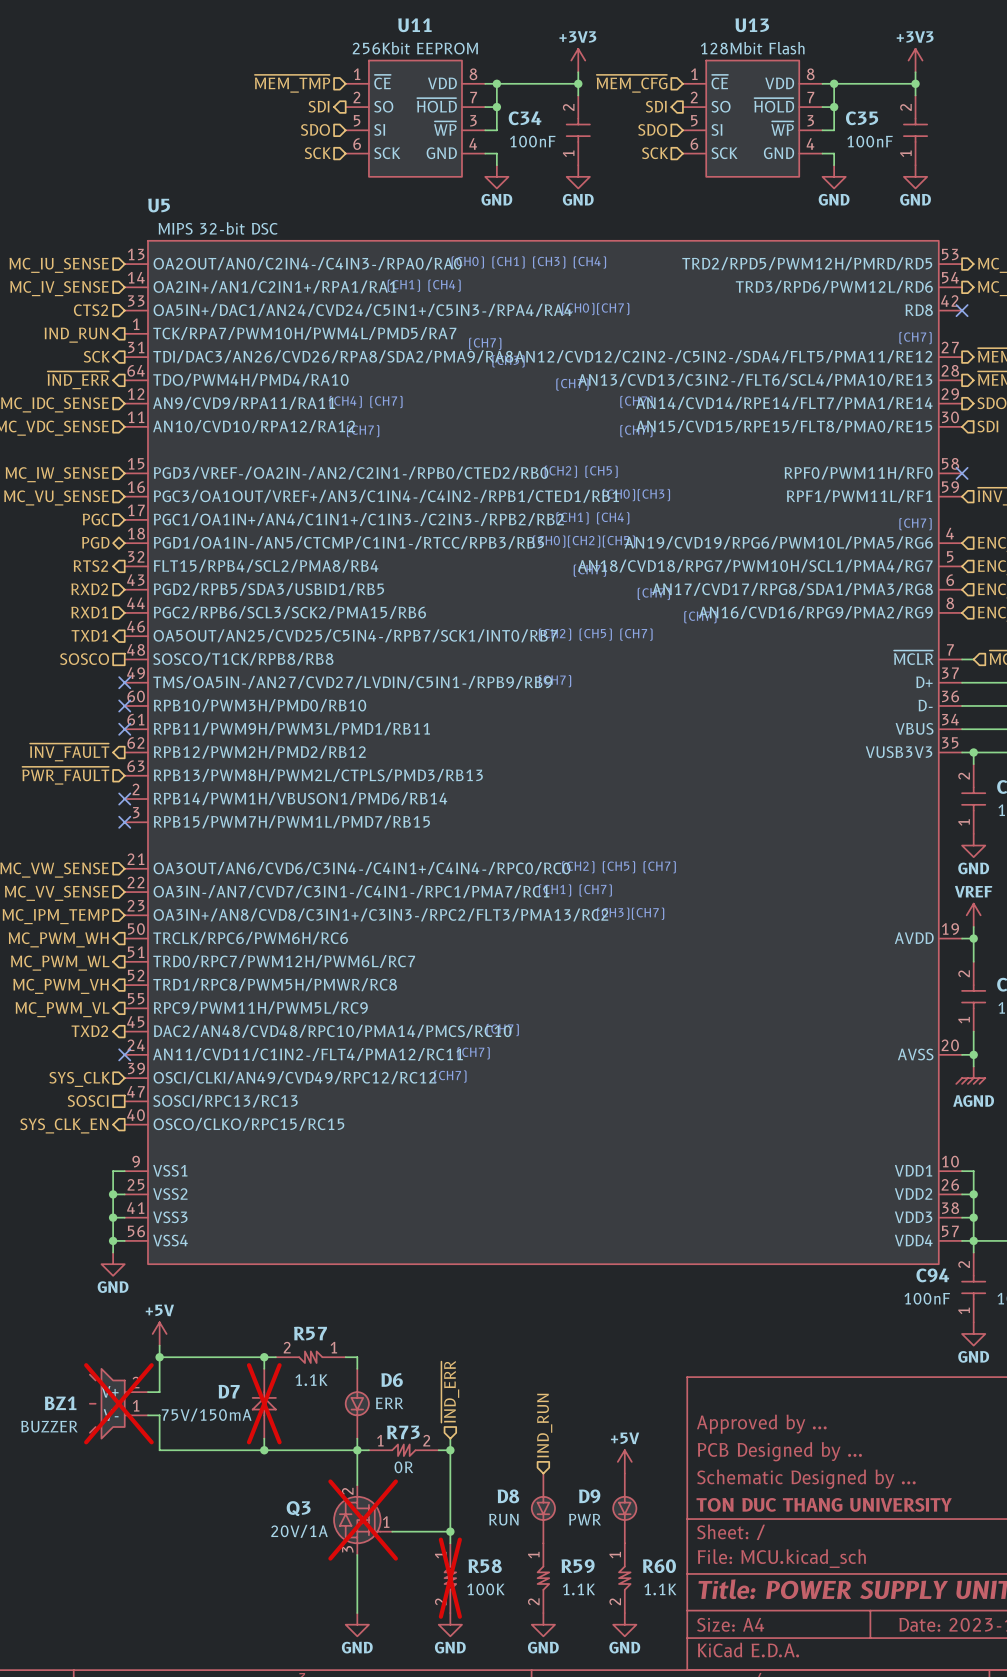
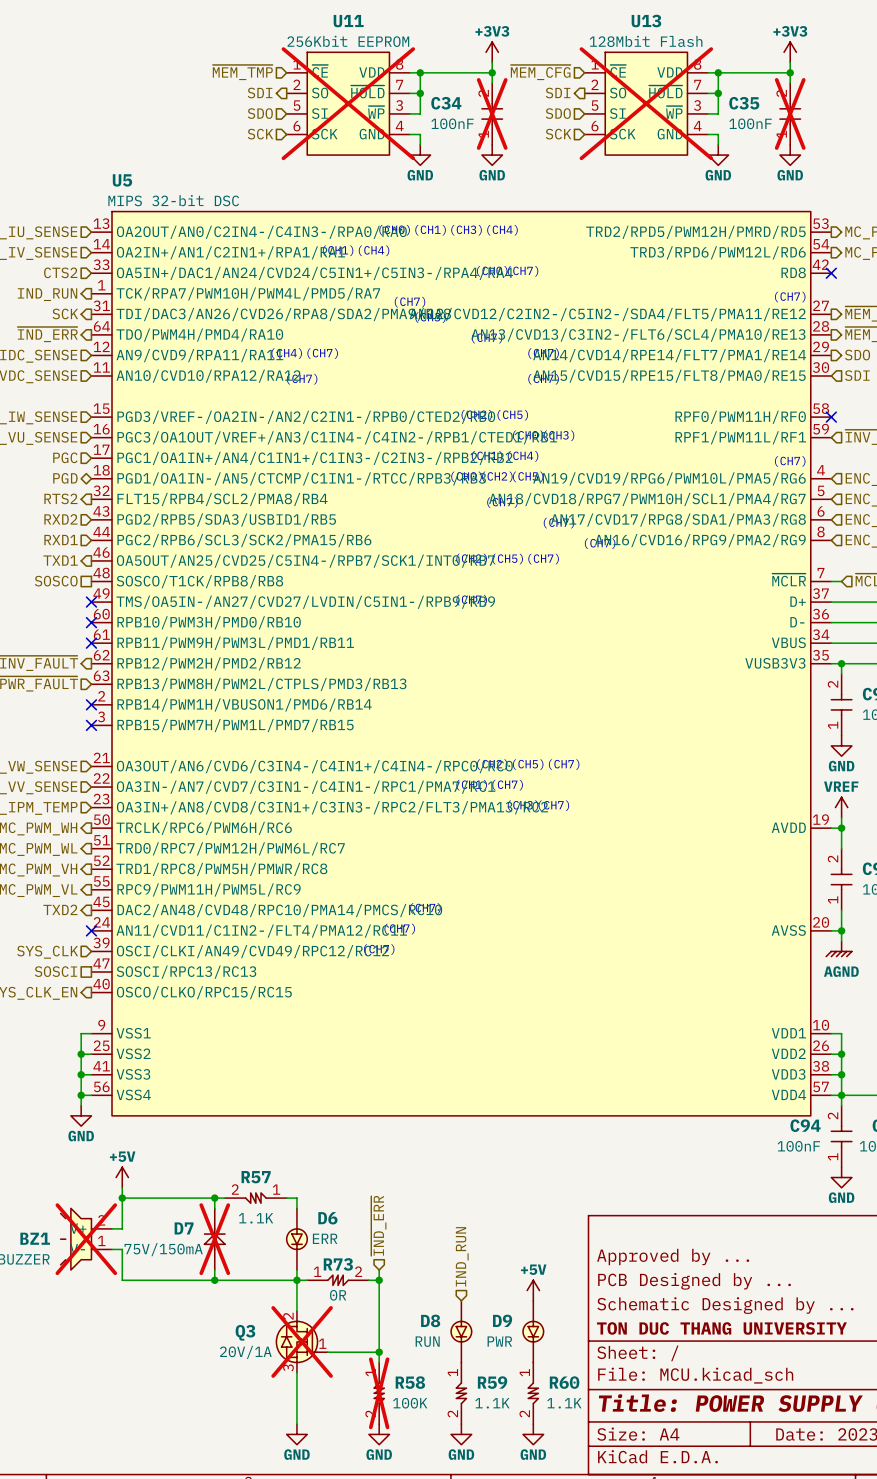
U11 do-not-place cross: none -> (348, 103)
U13 do-not-place cross: none -> (646, 103)
C34 do-not-place cross: none -> (492, 113)
C35 do-not-place cross: none -> (790, 113)

